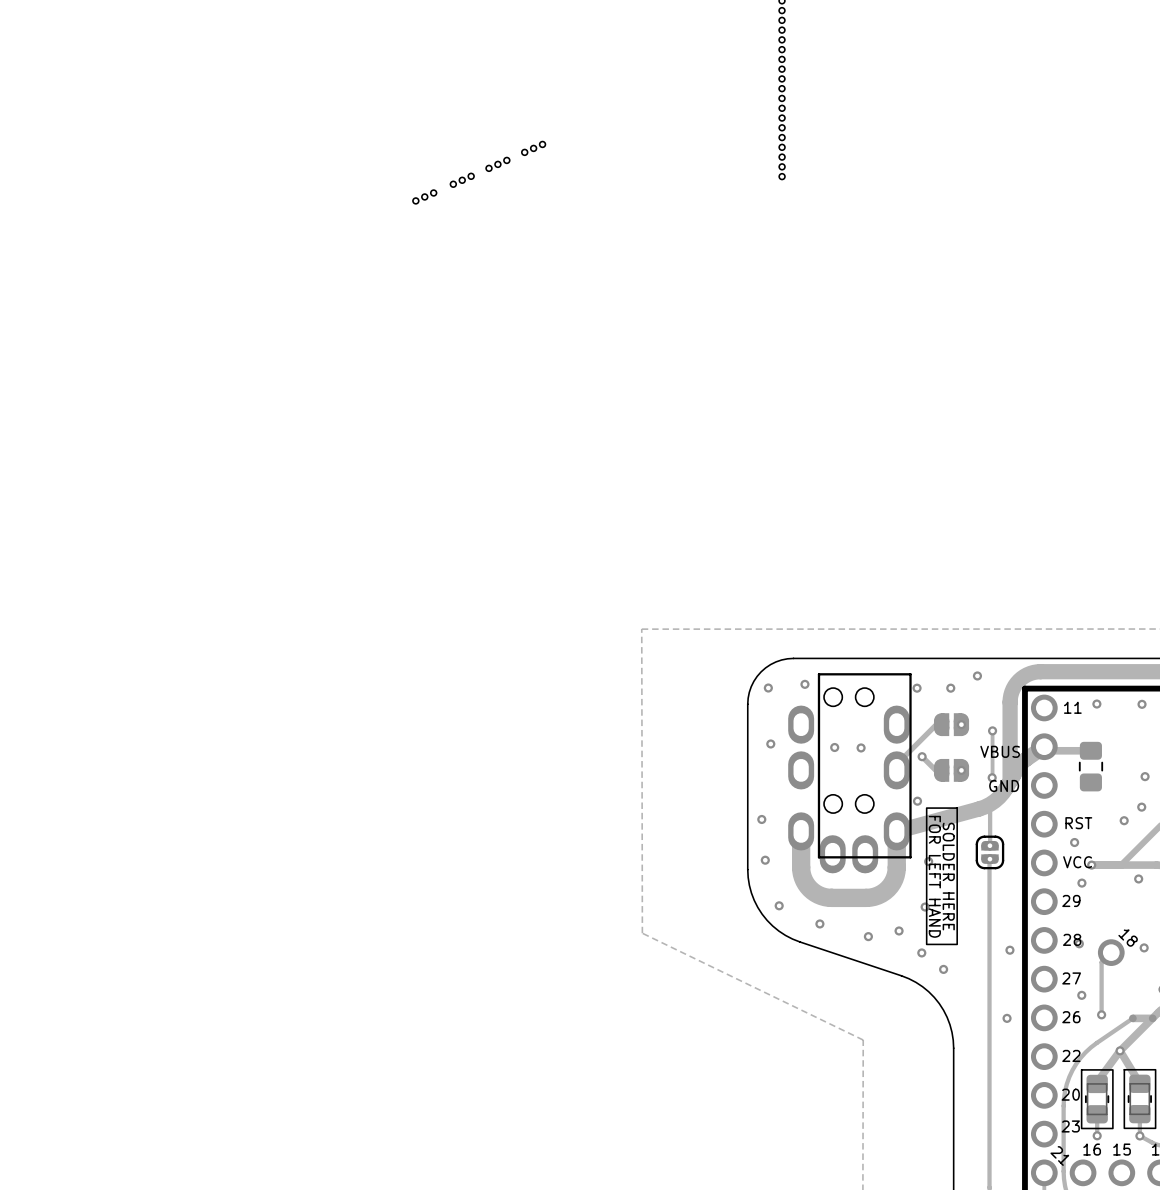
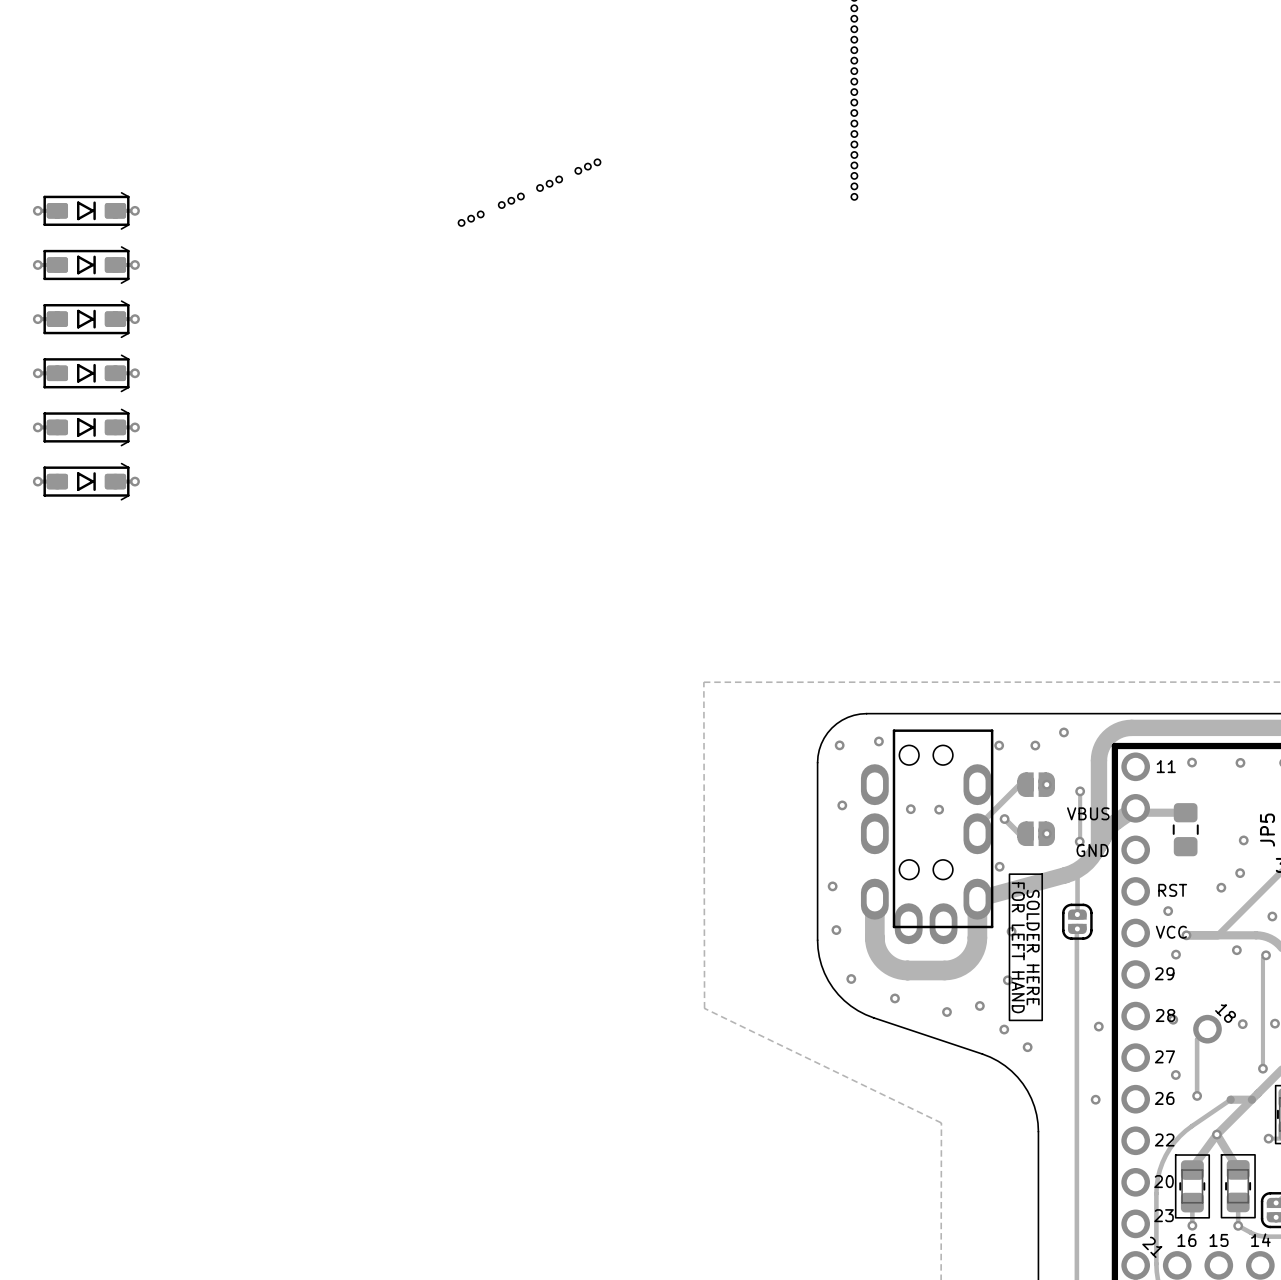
part: none -> (86, 210)
part: none -> (86, 265)
part: none -> (86, 319)
part: none -> (86, 373)
part: none -> (86, 427)
part: none -> (86, 481)

